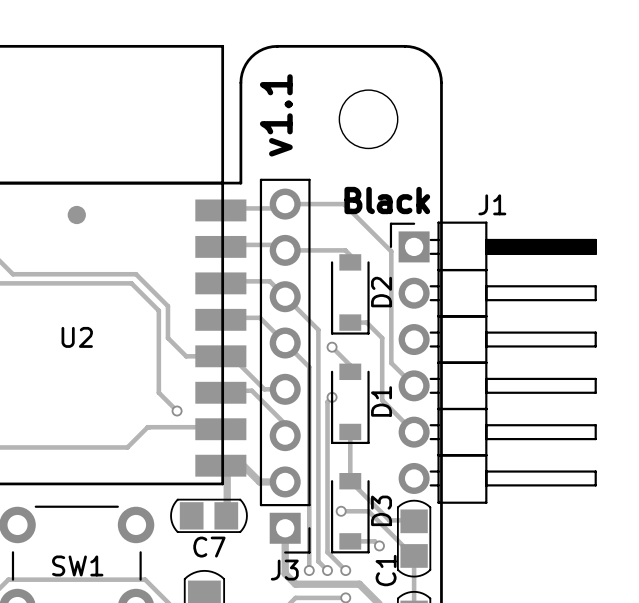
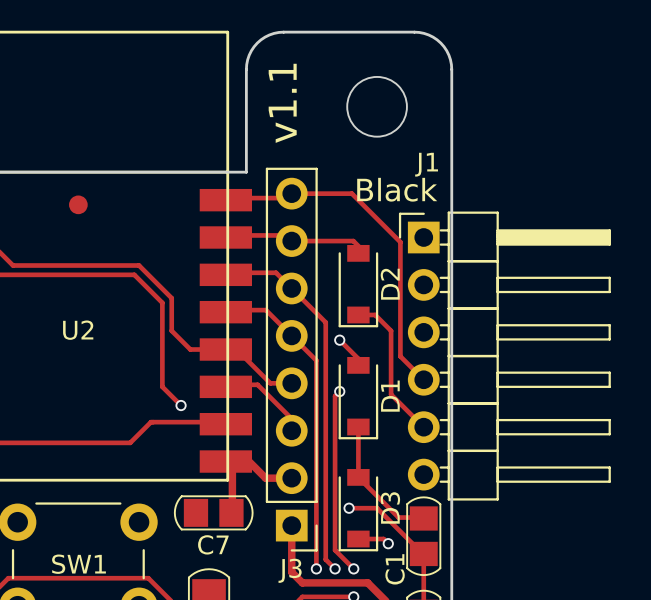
J1 name position: J1 (492, 204) -> J1 (426, 164)

